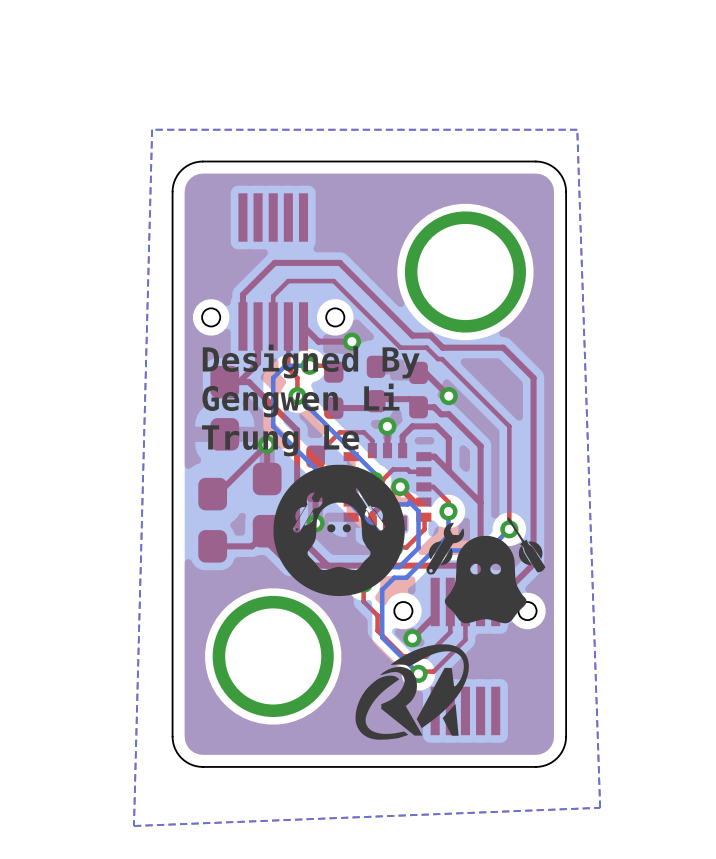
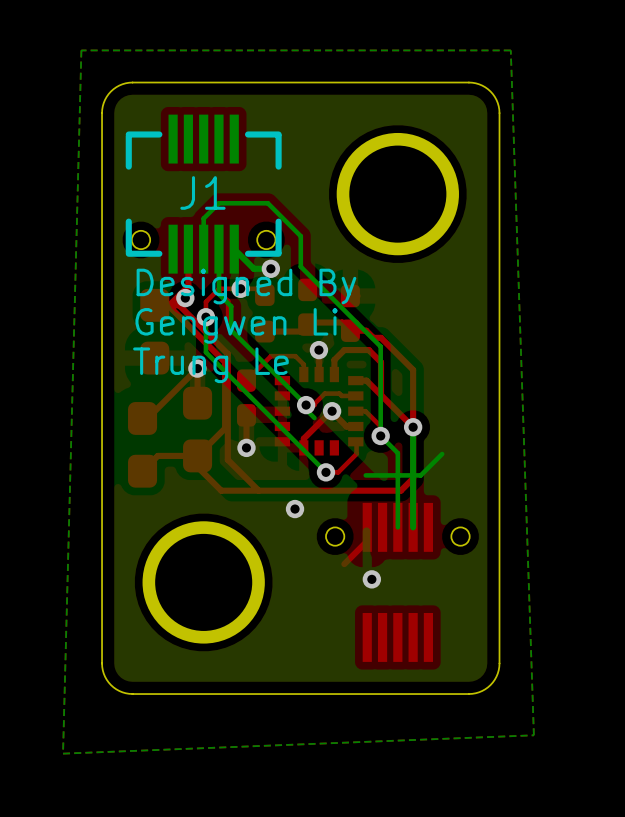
J1 side: top (273, 272) -> bottom (203, 194)
top track: (242, 326) (242, 294) (274, 262) (339, 262) (412, 335) (430, 335) (442, 347) (503, 347) (533, 377) (533, 564) (495, 601) -> none
top track: (273, 326) (273, 296) (288, 281) (333, 281) (400, 347) (426, 347) (438, 359) (442, 359) (509, 426) (509, 529) -> none
bottom track: none -> (203, 249) (203, 218) (218, 203) (267, 203) (300, 236) (300, 266) (380, 346) (380, 435) (397, 453) (397, 527)
top track: (303, 326) (318, 341) (351, 341) -> none
bottom track: none -> (234, 249) (253, 268) (270, 268)
via position: (351, 341) -> (270, 268)
top track: none -> (240, 288) (219, 288) (205, 301) (205, 317)
bottom track: (309, 365) (285, 365) (273, 377) (273, 426) (275, 428) -> (205, 317) (205, 352)
top track: (425, 372) (448, 396) -> none
via: none -> (185, 298)
bottom track: (297, 396) (374, 473) (374, 480) -> (218, 249) (218, 294) (231, 306) (231, 330) (306, 405)
via position: (297, 396) -> (205, 317)
via: (448, 396) -> none
drawing: [273, 464, 546, 740] -> none
bottom track: (382, 494) (393, 504) (407, 504) (409, 502) (418, 511) (418, 547) (399, 567) (386, 567) (370, 583) (363, 583) -> none
bottom track: none -> (413, 427) (413, 527)
bottom track: (448, 511) (448, 535) (406, 577) (394, 577) (382, 589) (382, 637) (418, 673) -> none
via position: (509, 529) -> (413, 427)
top track: (267, 531) (252, 546) (212, 546) -> (168, 305) (225, 362) (225, 428) (197, 455) (157, 455) (142, 471)
top track: (363, 583) (363, 601) (377, 615) (377, 630) (403, 656) (426, 656) (450, 632) (450, 601) -> none
top track: (465, 601) (465, 639) (433, 671) (420, 671) (418, 673) -> none
via: (412, 638) -> none
via: none -> (371, 579)
via: (418, 673) -> none

